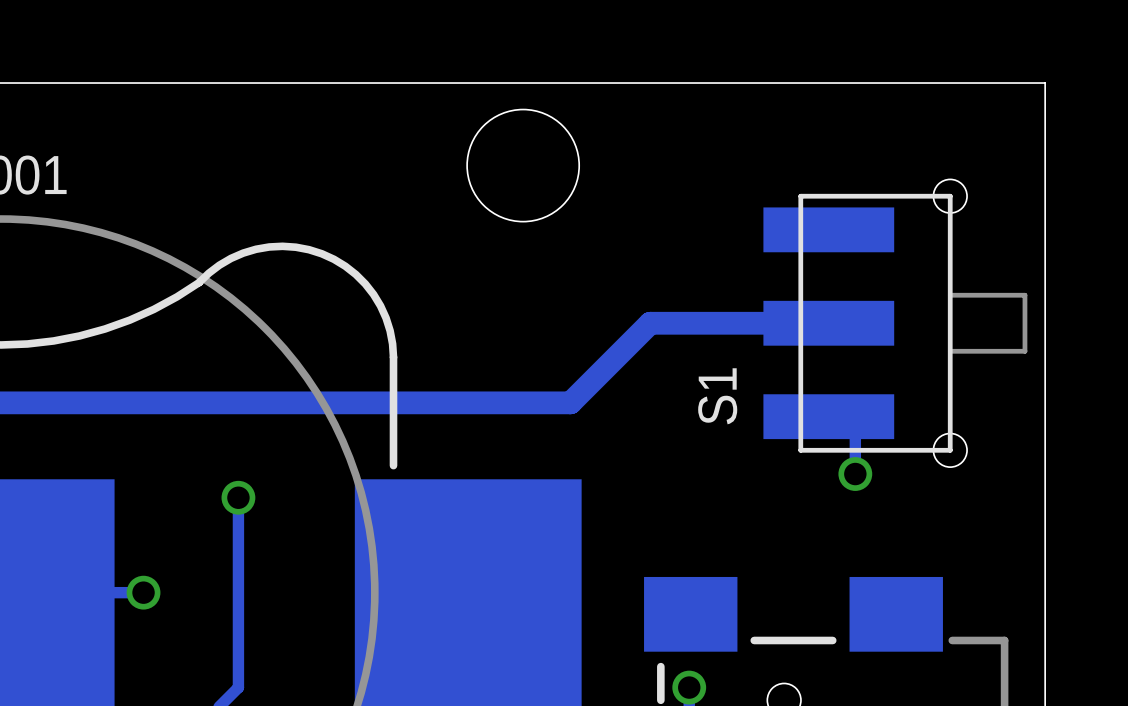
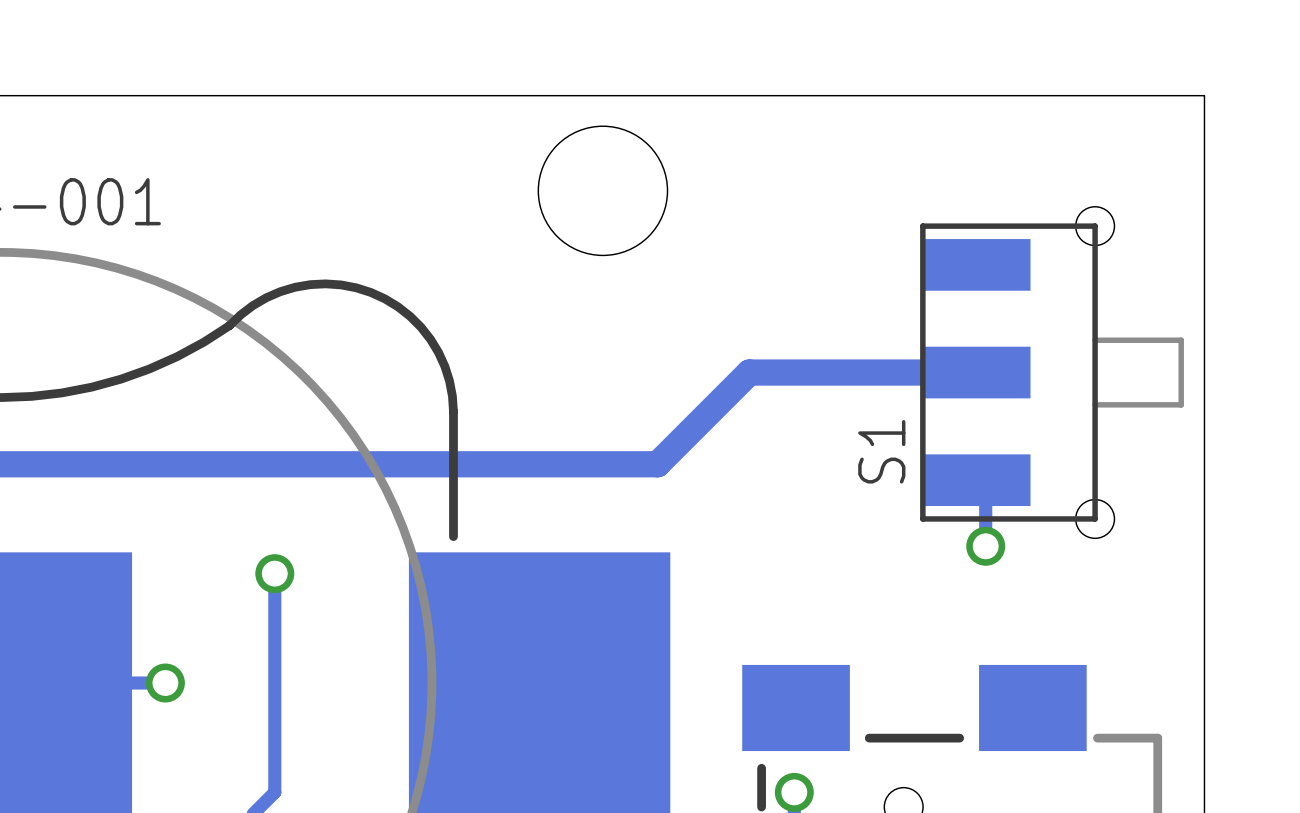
S1 footprint: [763, 179, 1028, 468] -> [920, 206, 1184, 539]
S1 name position: S1 (717, 396) -> S1 (881, 451)

